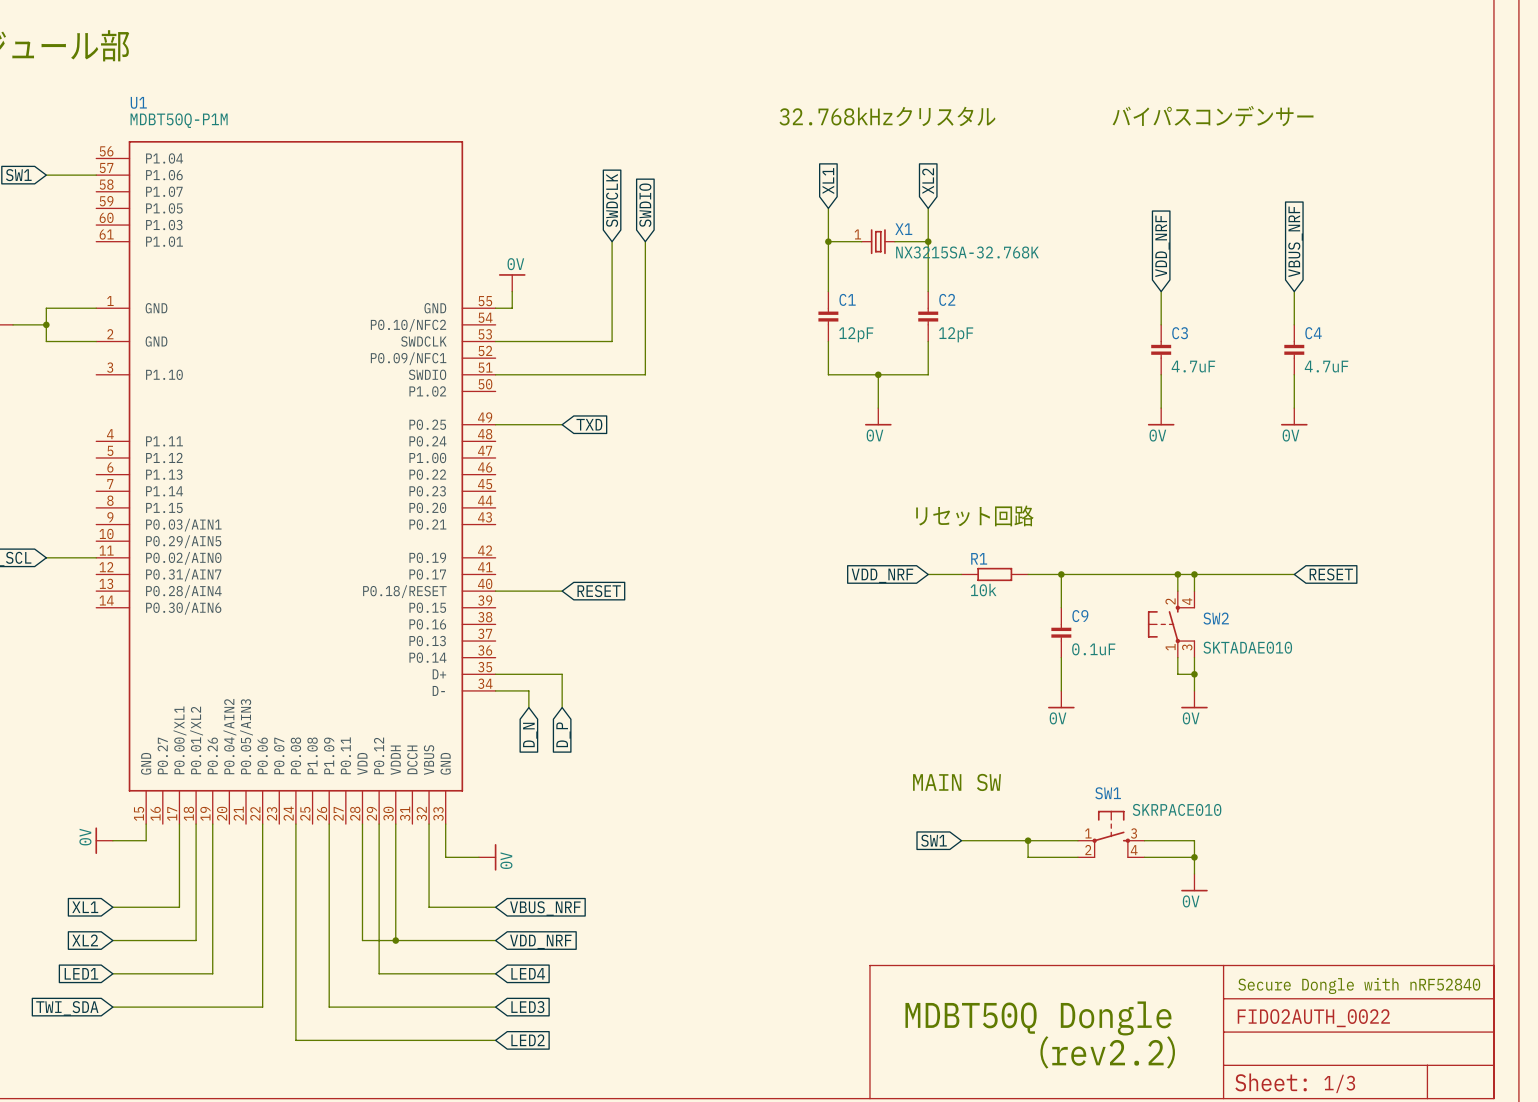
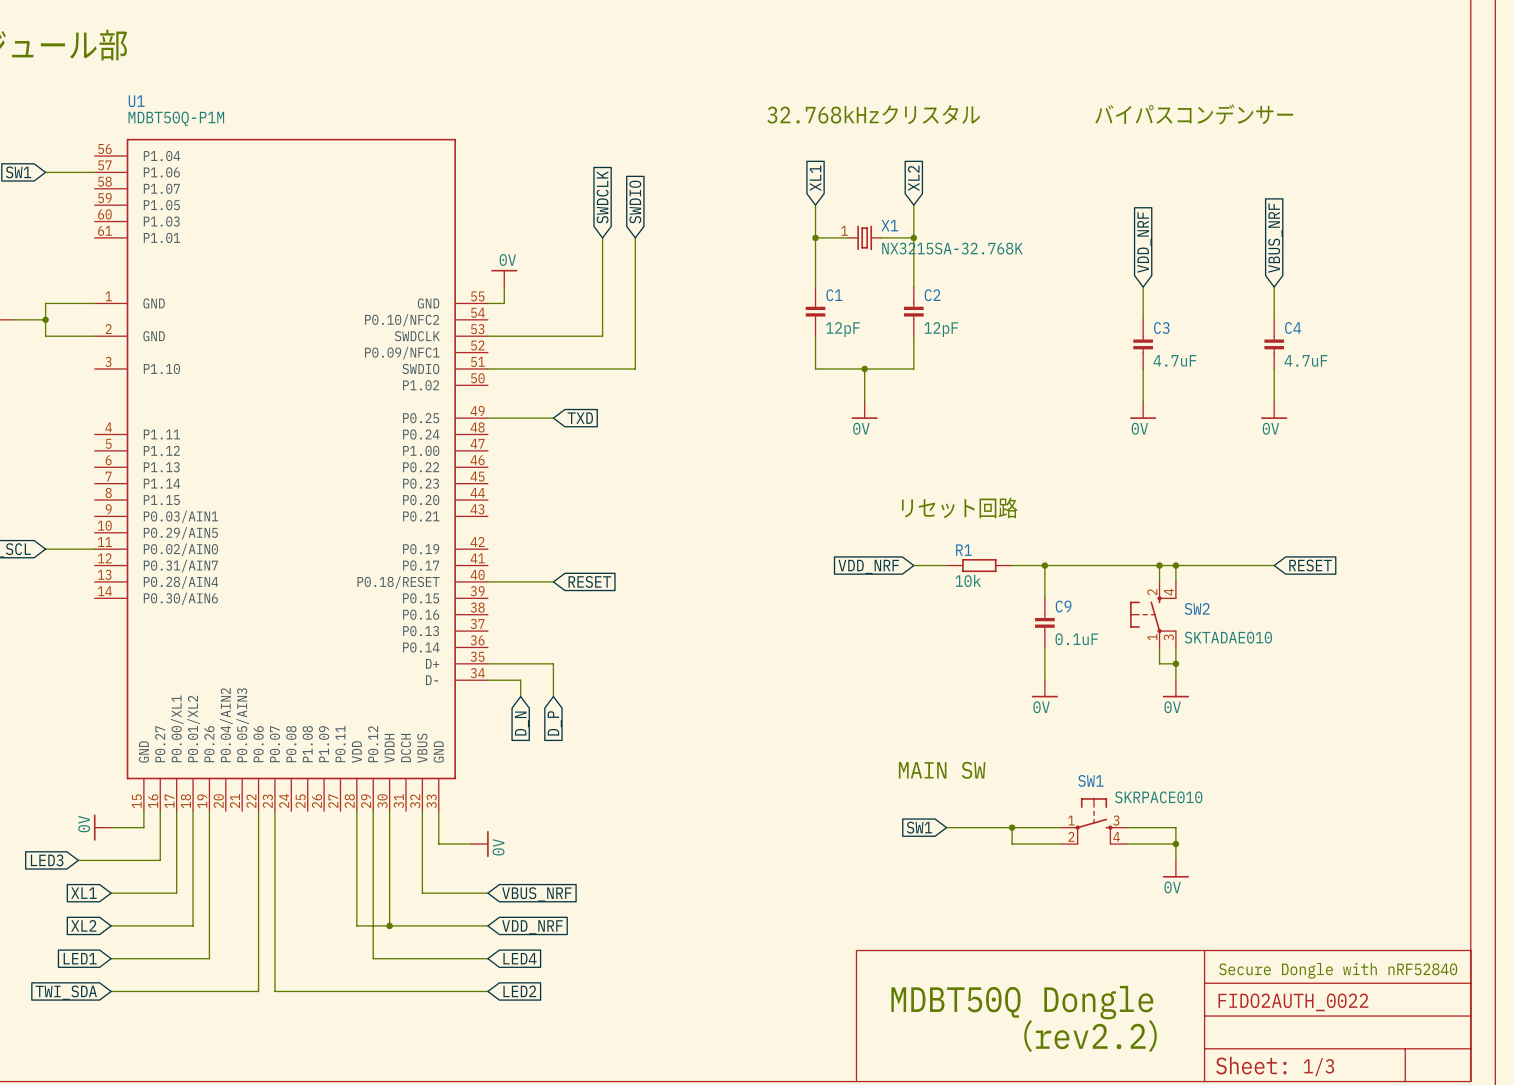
wire: none -> (160, 811) (160, 860) (78, 860)
wire: (295, 824) (295, 1040) (495, 1040) -> none
wire: (329, 824) (329, 1007) -> (274, 811) (274, 991) (324, 991)
global label: none -> LED3 (47, 860)
global label: LED3 (527, 1007) -> LED2 (519, 991)
global label: LED2 (528, 1040) -> none

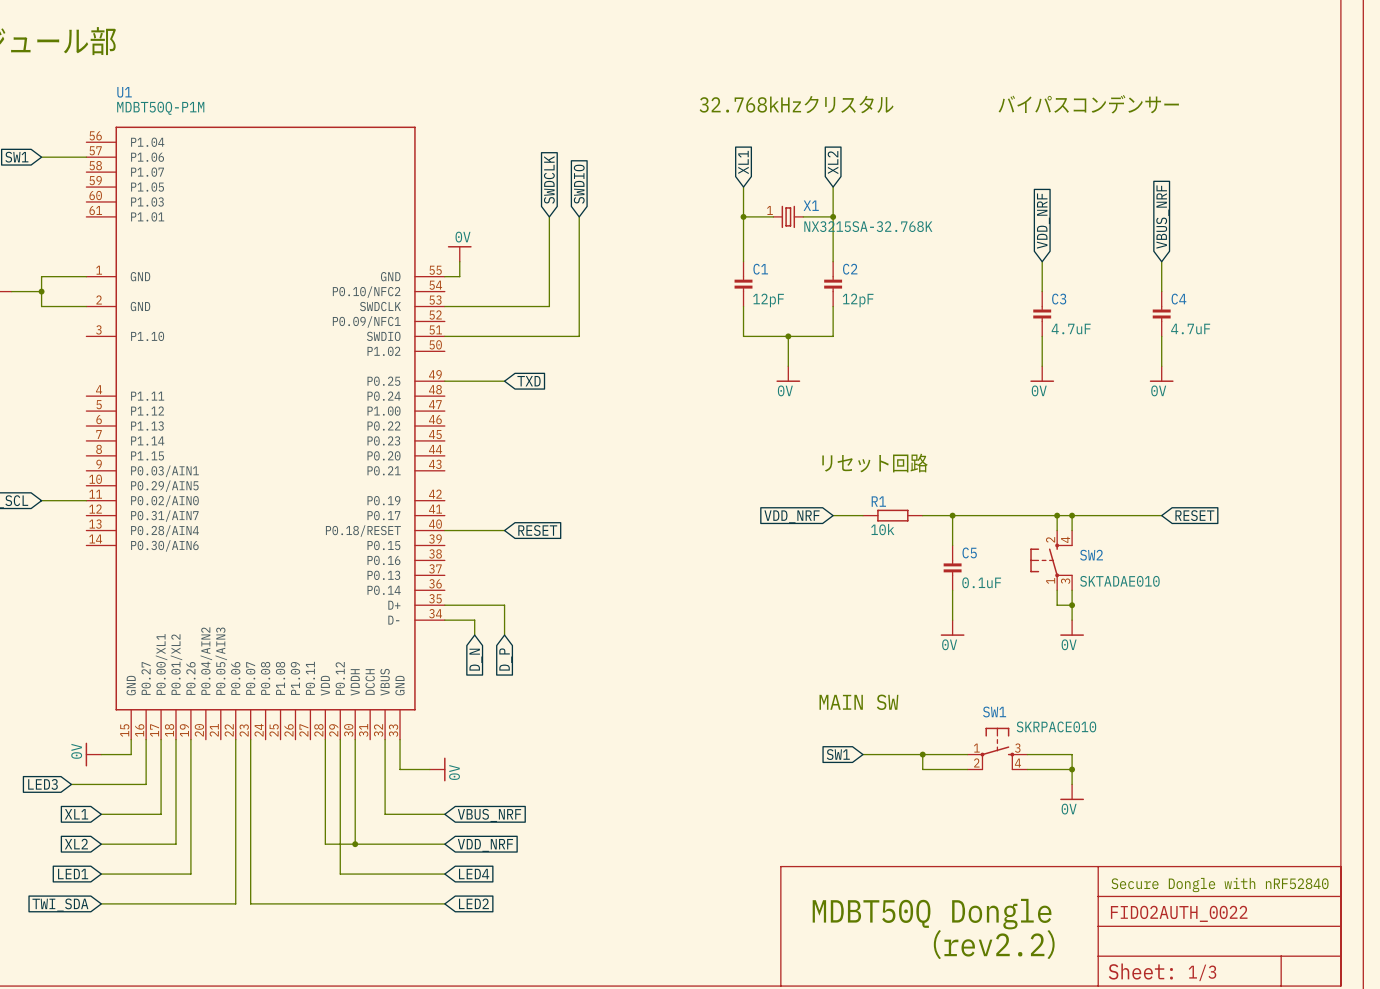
C9 name: C9 (1063, 606) -> C5 (969, 552)

